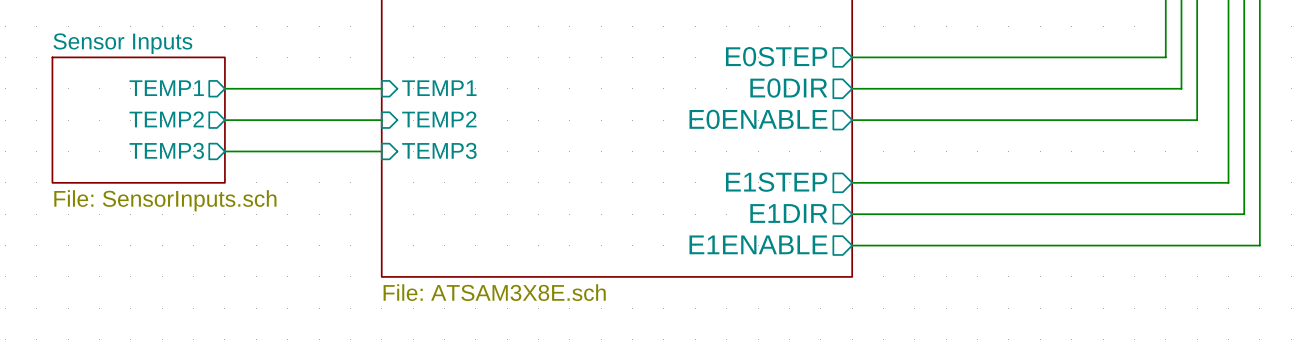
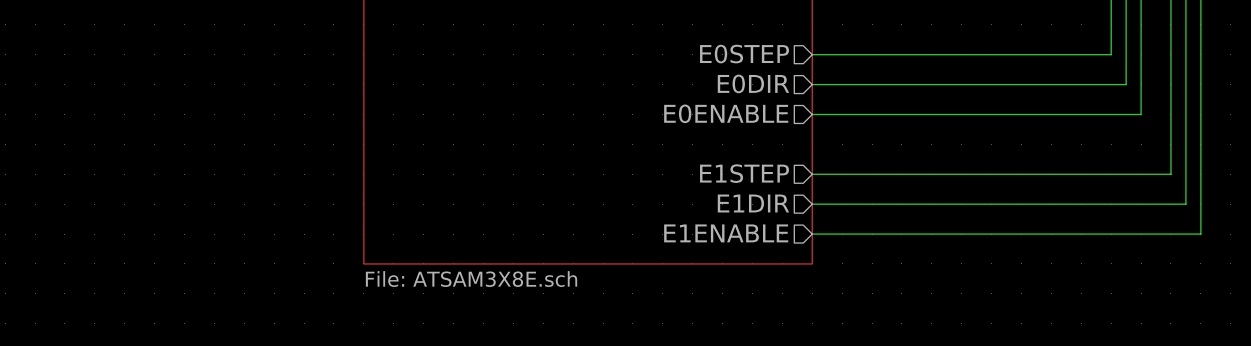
sheet pin: TEMP1 (166, 88) -> none
wire: (224, 88) (381, 88) -> none
sheet pin: TEMP1 (439, 88) -> none
sheet pin: TEMP2 (166, 119) -> none
sheet pin: TEMP2 (439, 119) -> none
sheet Sensor Inputs: File: SensorInputs.sch (138, 120) -> none
wire: (224, 120) (381, 120) -> none
sheet pin: TEMP3 (166, 150) -> none
sheet pin: TEMP3 (439, 150) -> none
wire: (224, 151) (381, 151) -> none

